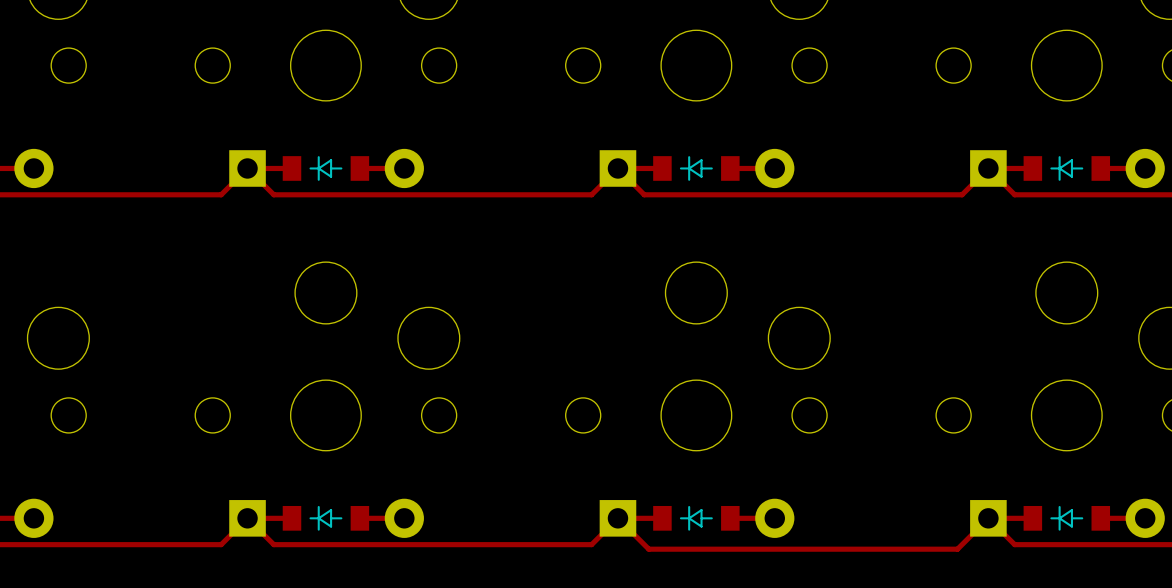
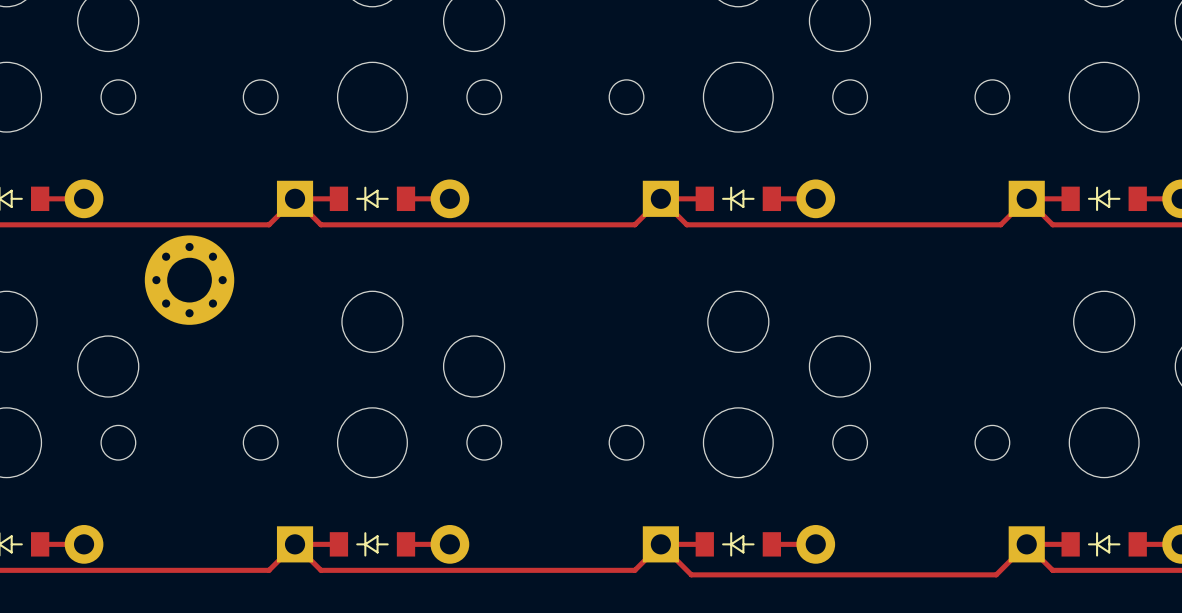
part: none -> (189, 280)

